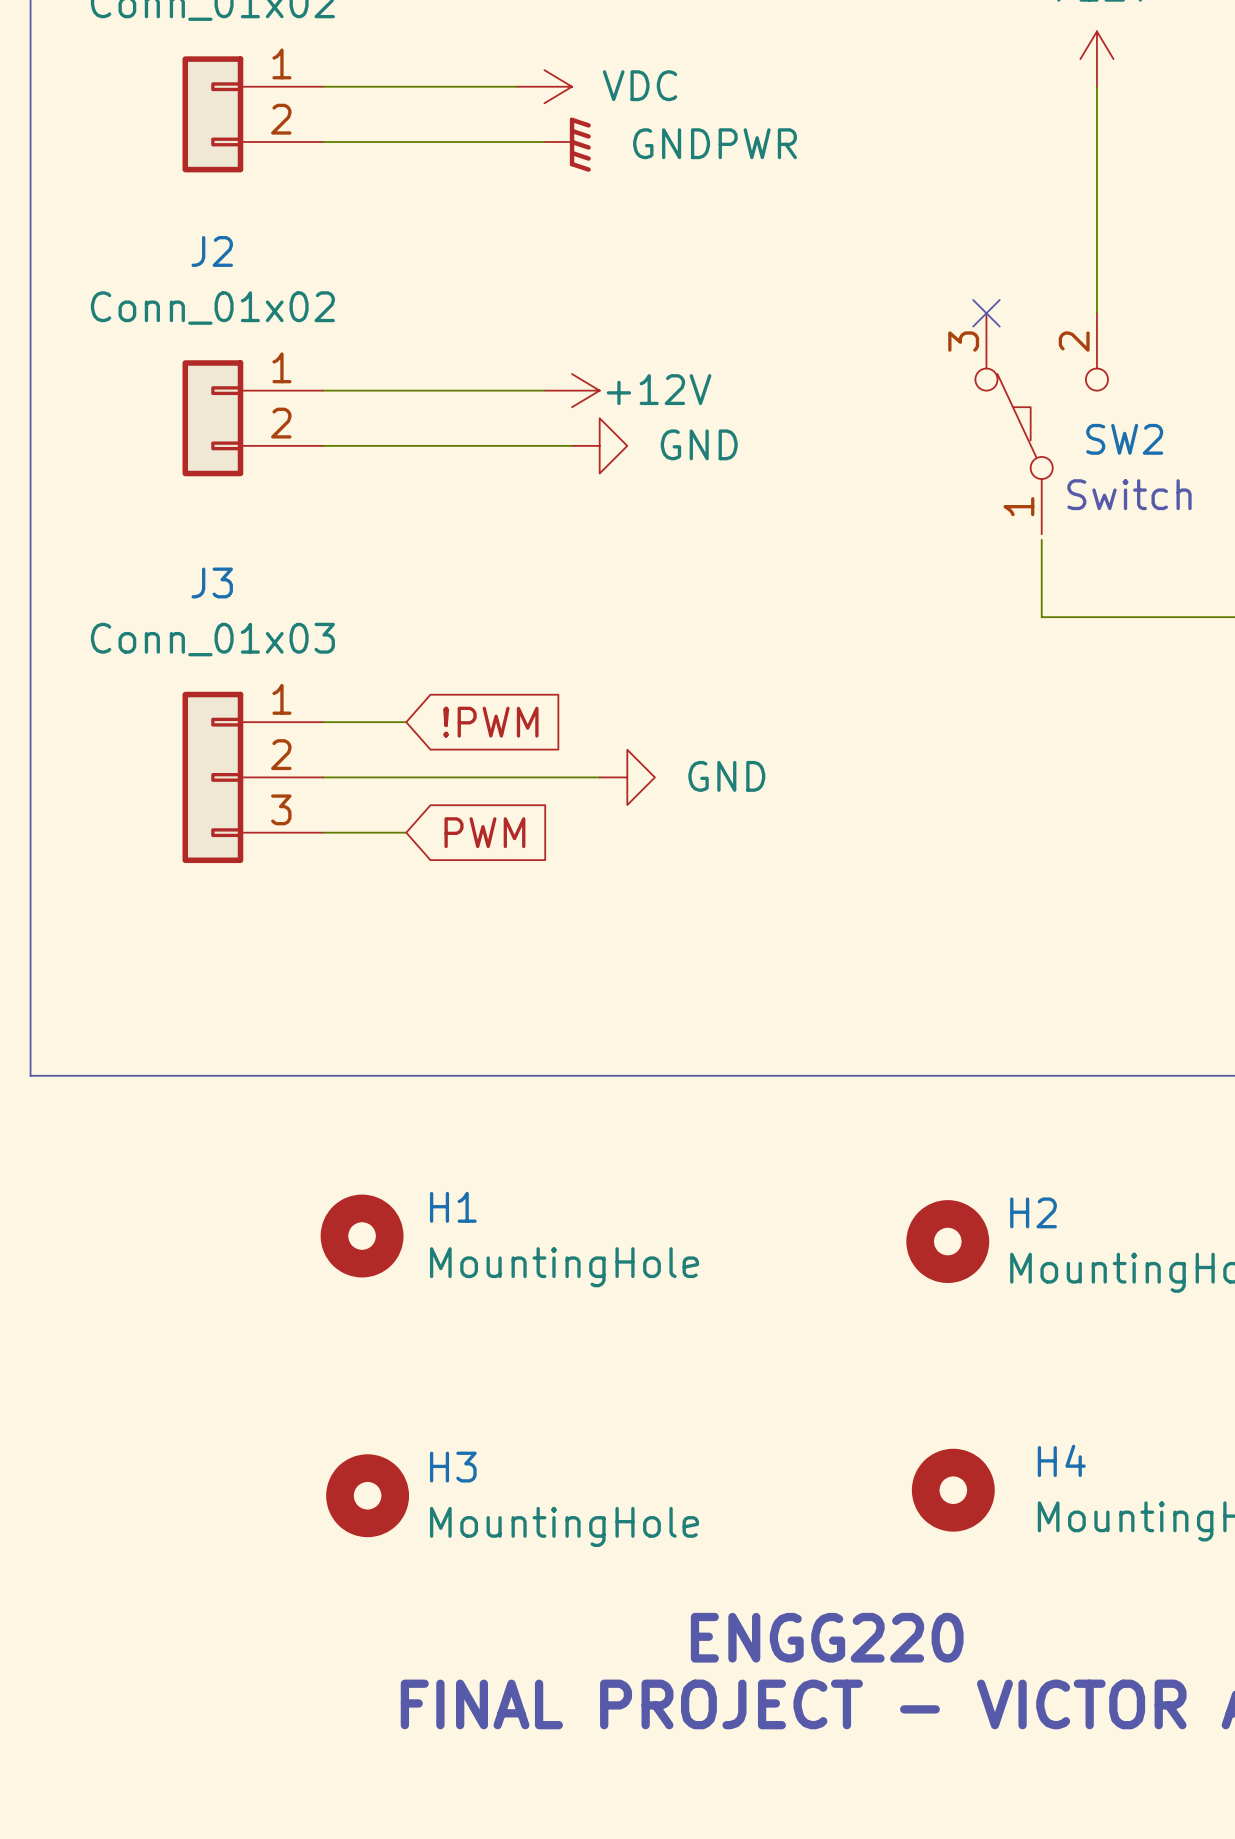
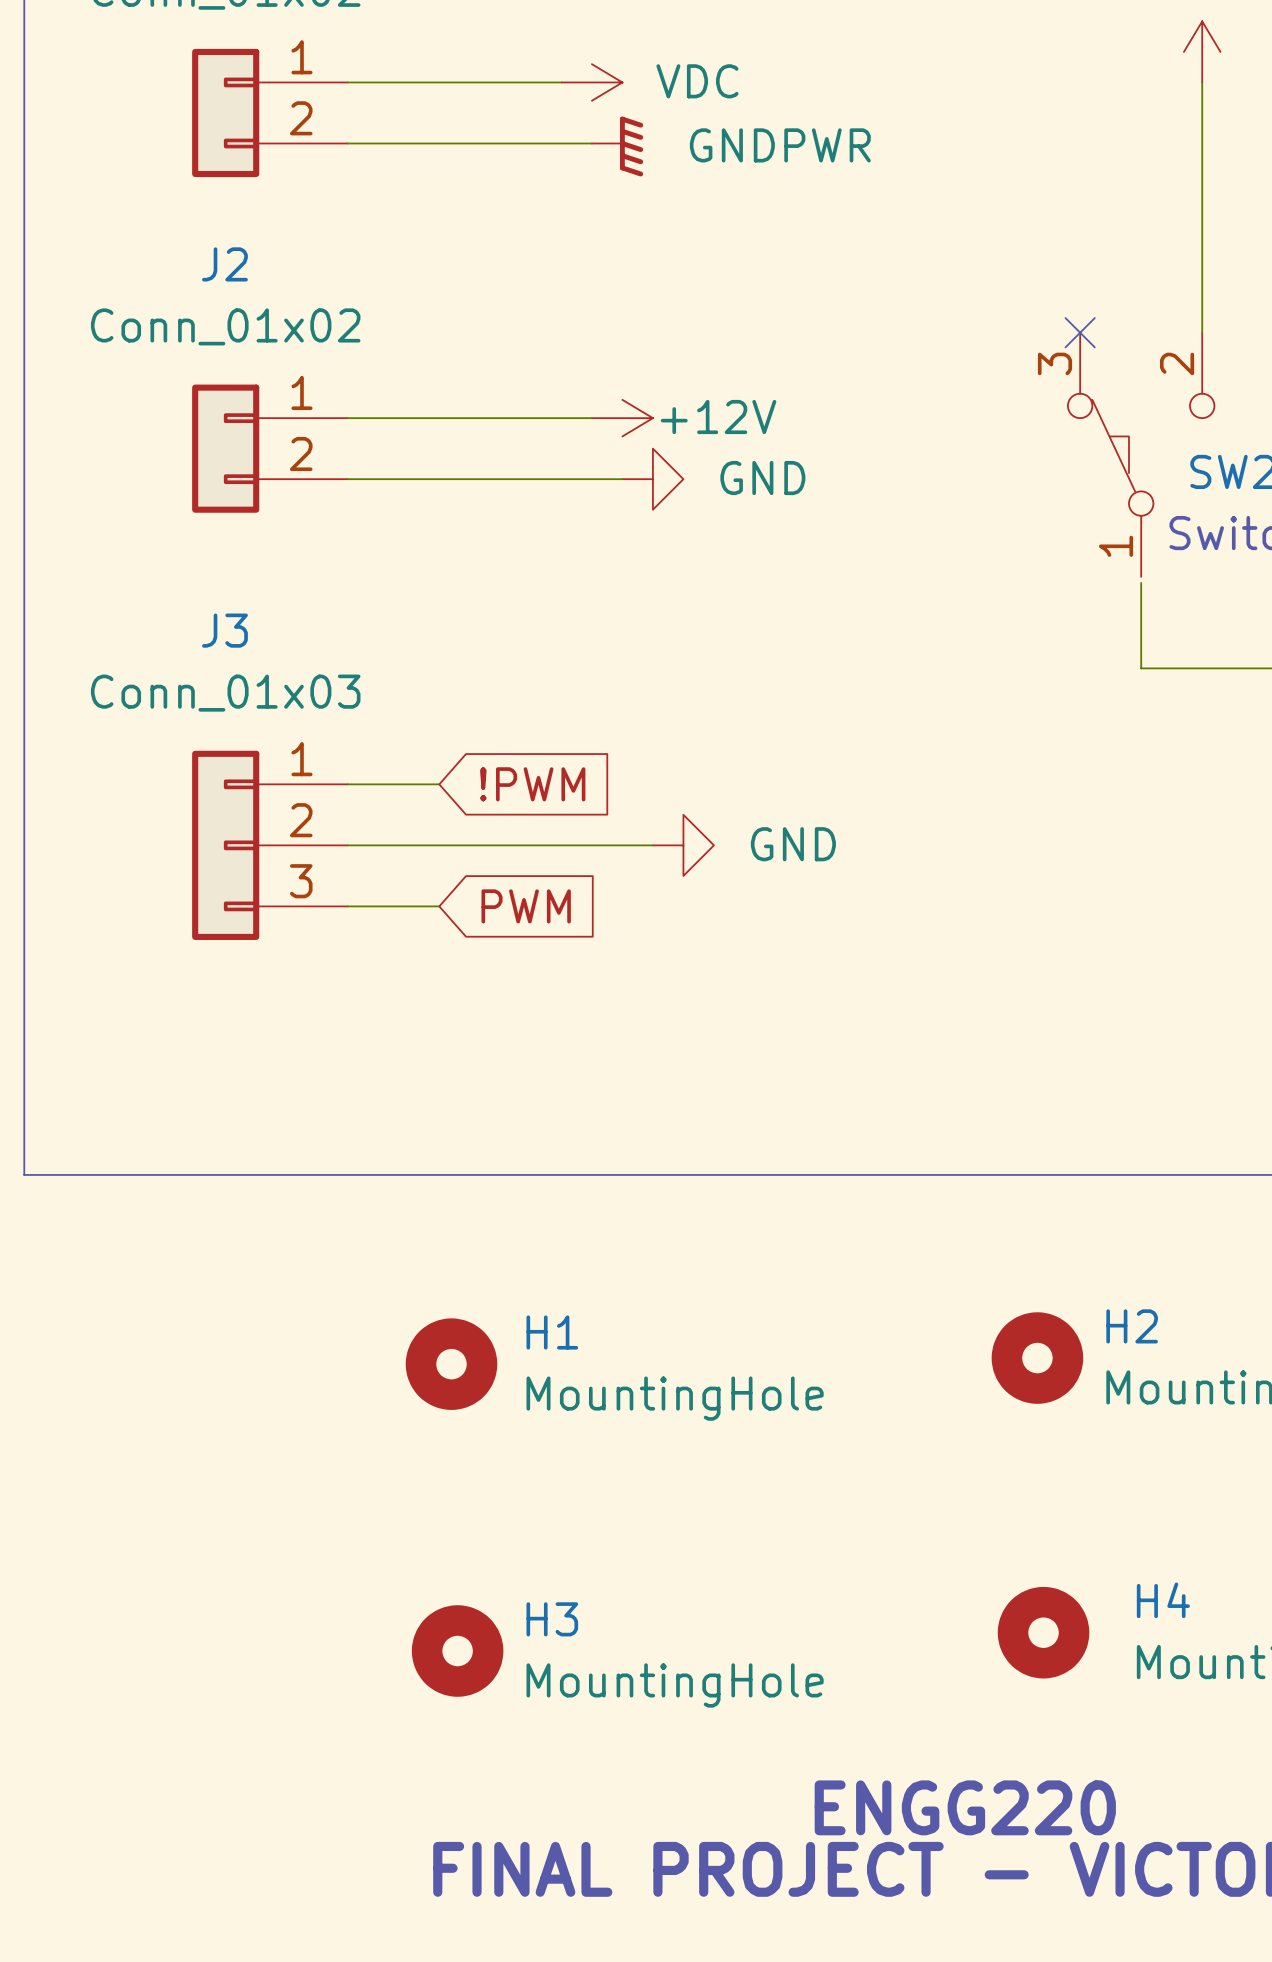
H1 position: (362, 1236) -> (451, 1364)
H3 position: (367, 1495) -> (457, 1651)
text position: ENGG220 (827, 1637) -> ENGG220 (965, 1807)

